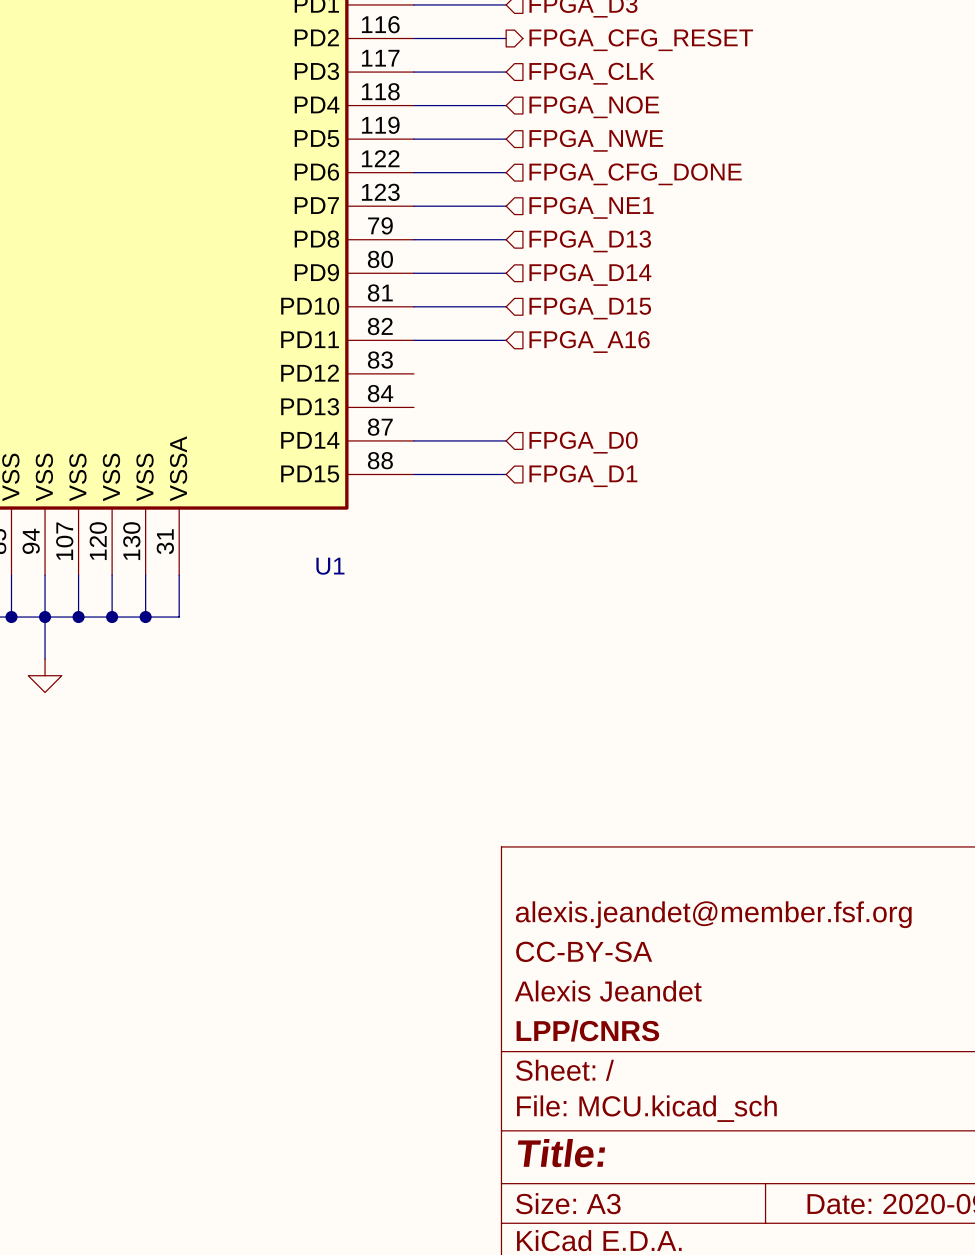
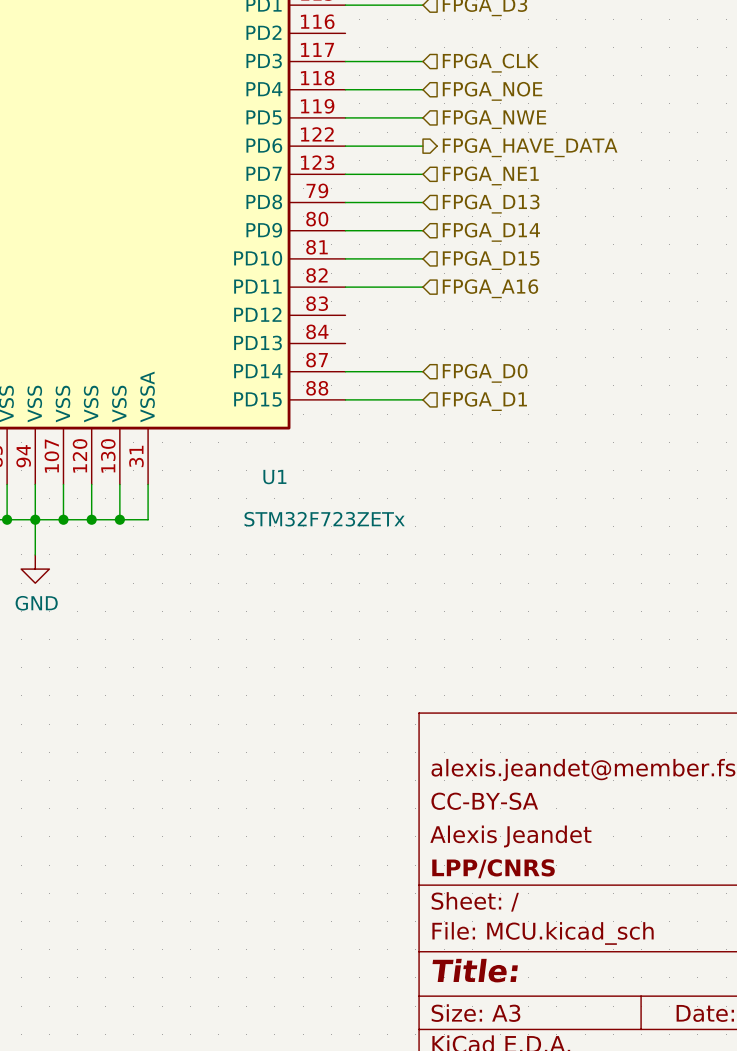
wire: (413, 38) (506, 38) -> none
hierarchical label: FPGA_CFG_RESET (641, 40) -> none
hierarchical label shape: input (635, 174) -> output (530, 147)
hierarchical label: FPGA_CFG_DONE (635, 174) -> FPGA_HAVE_DATA (530, 147)
U1 value: none -> STM32F723ZETx (324, 519)
power symbol text: none -> GND (36, 603)

